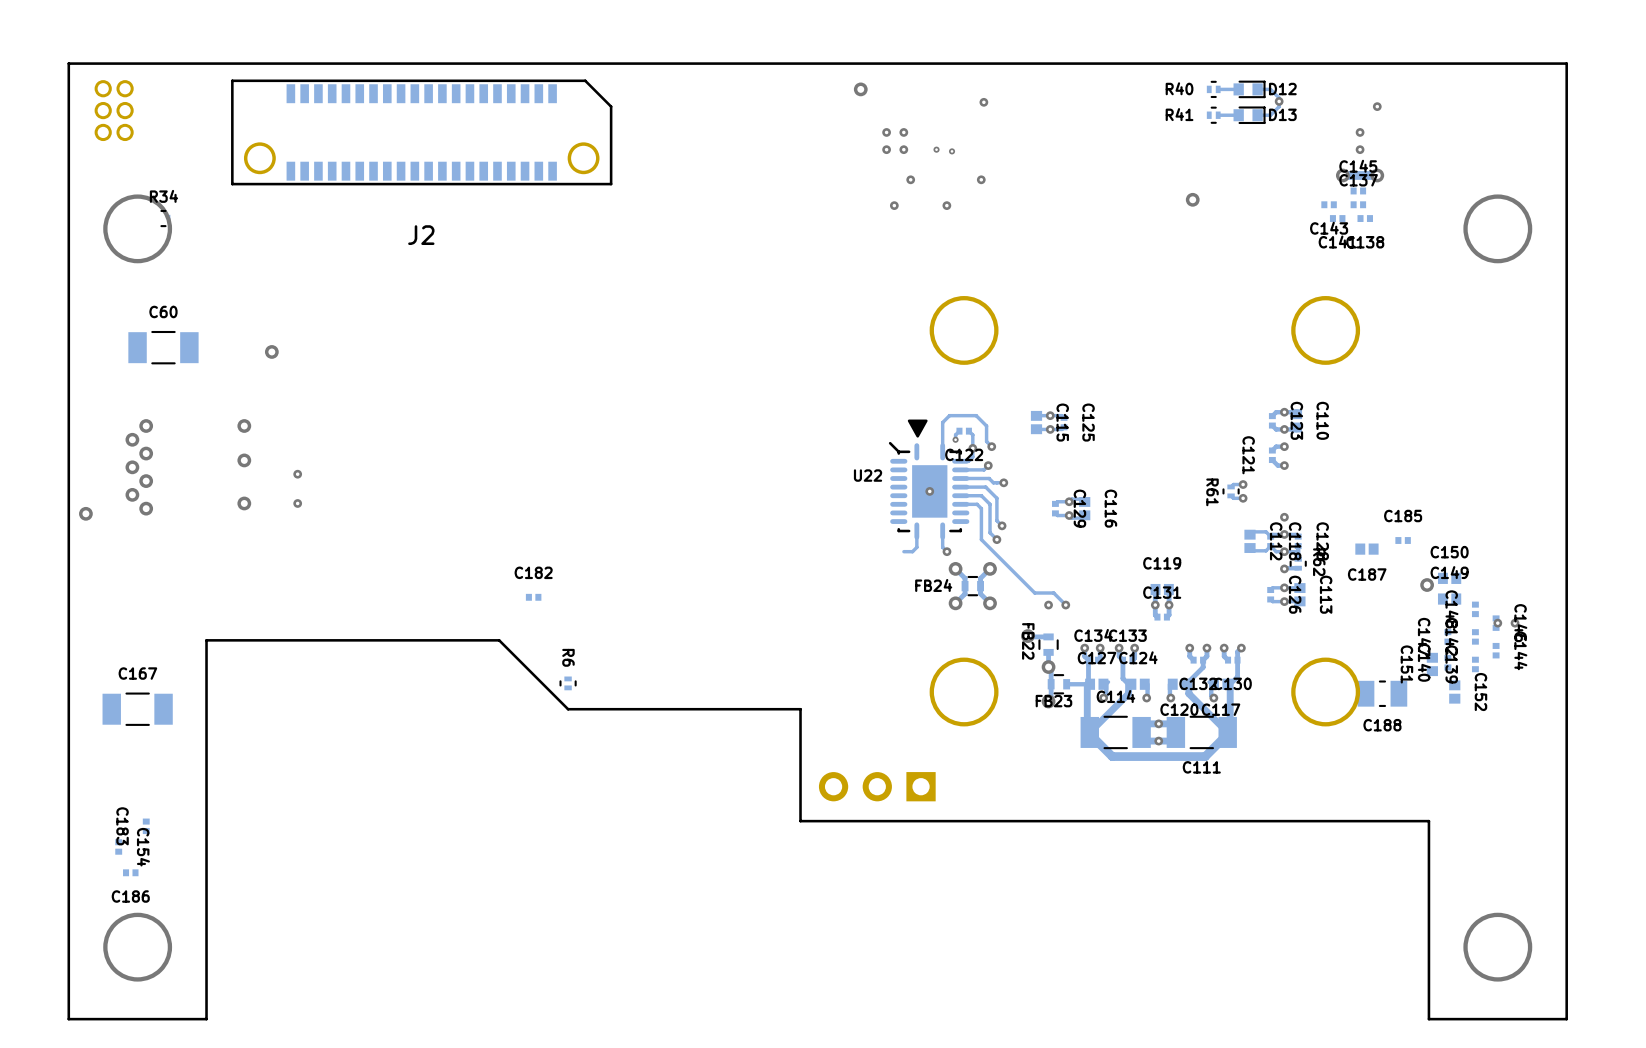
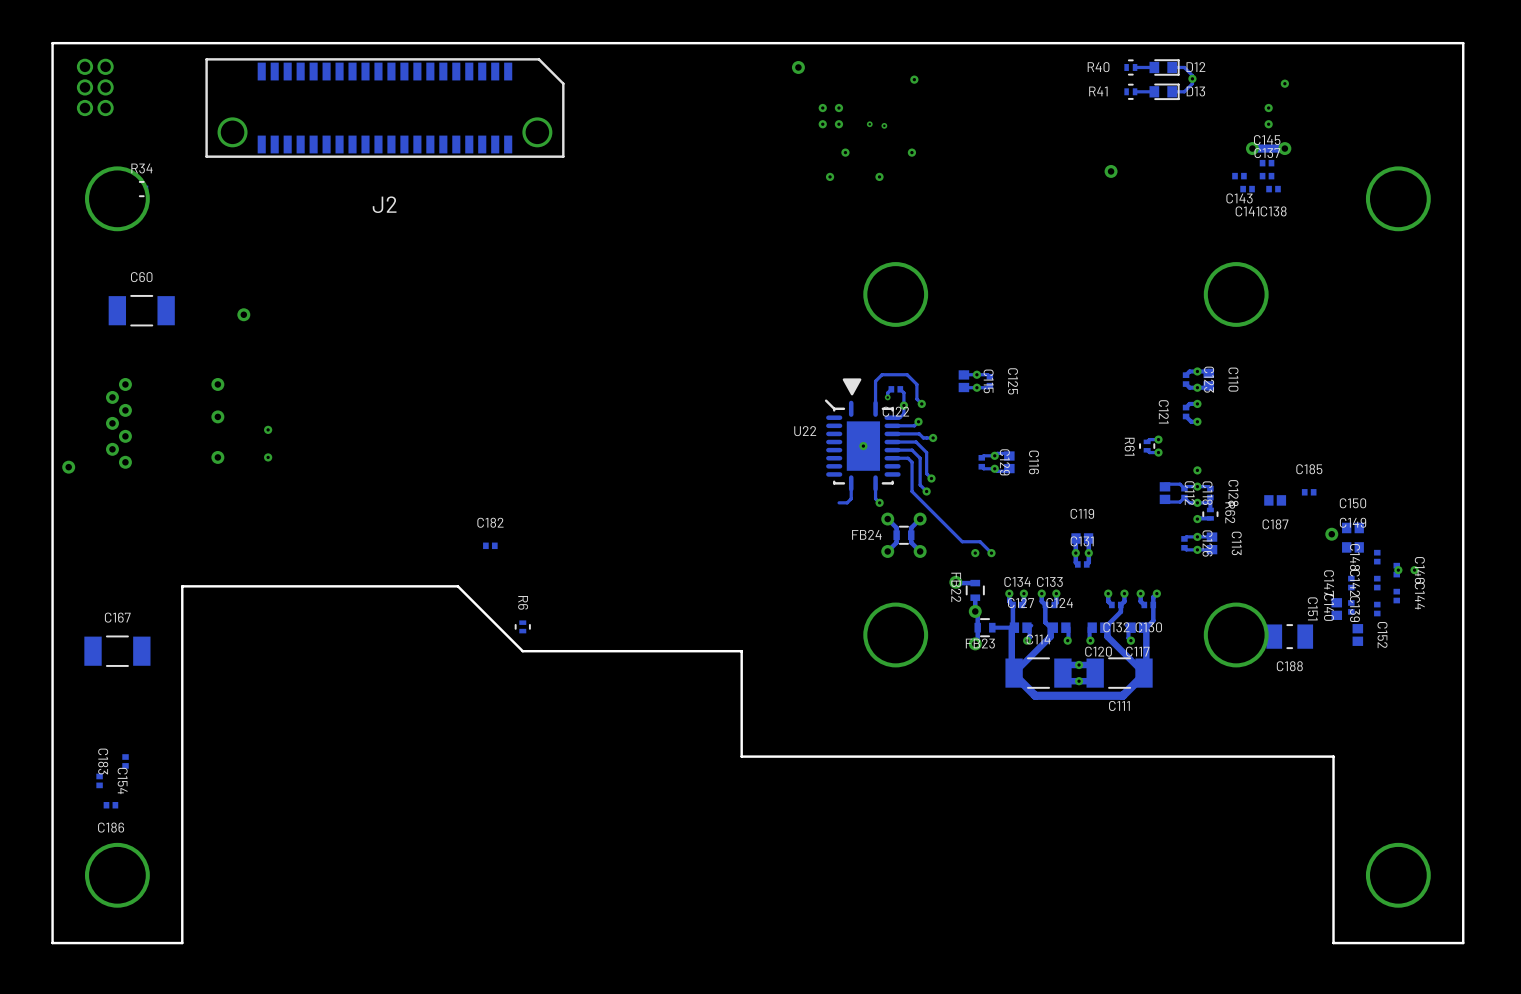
part: (877, 786) -> none

